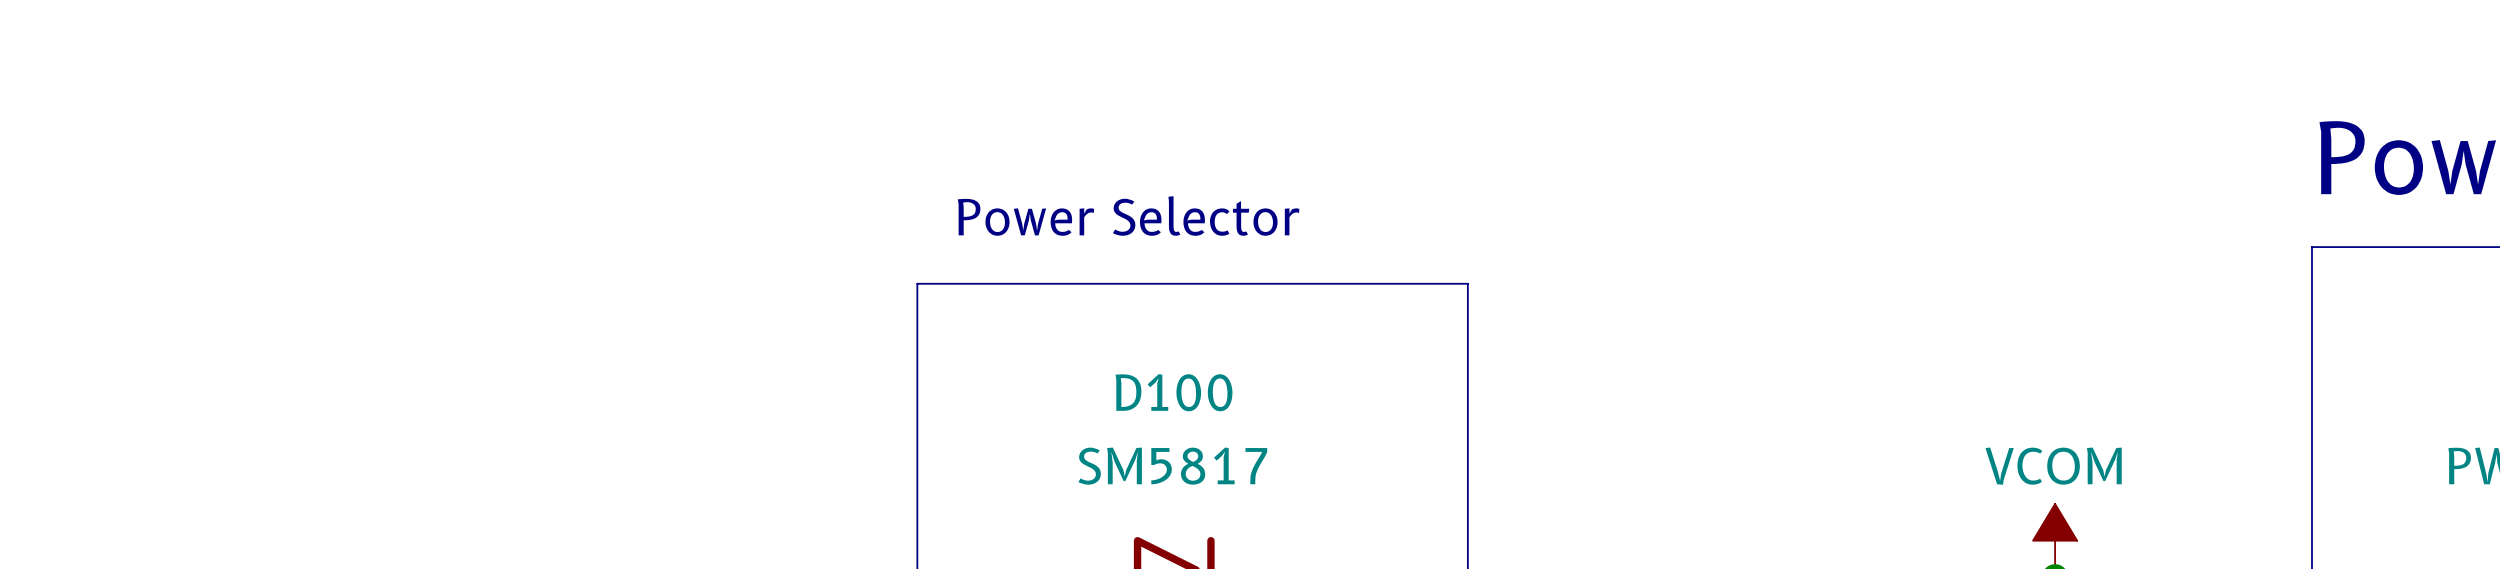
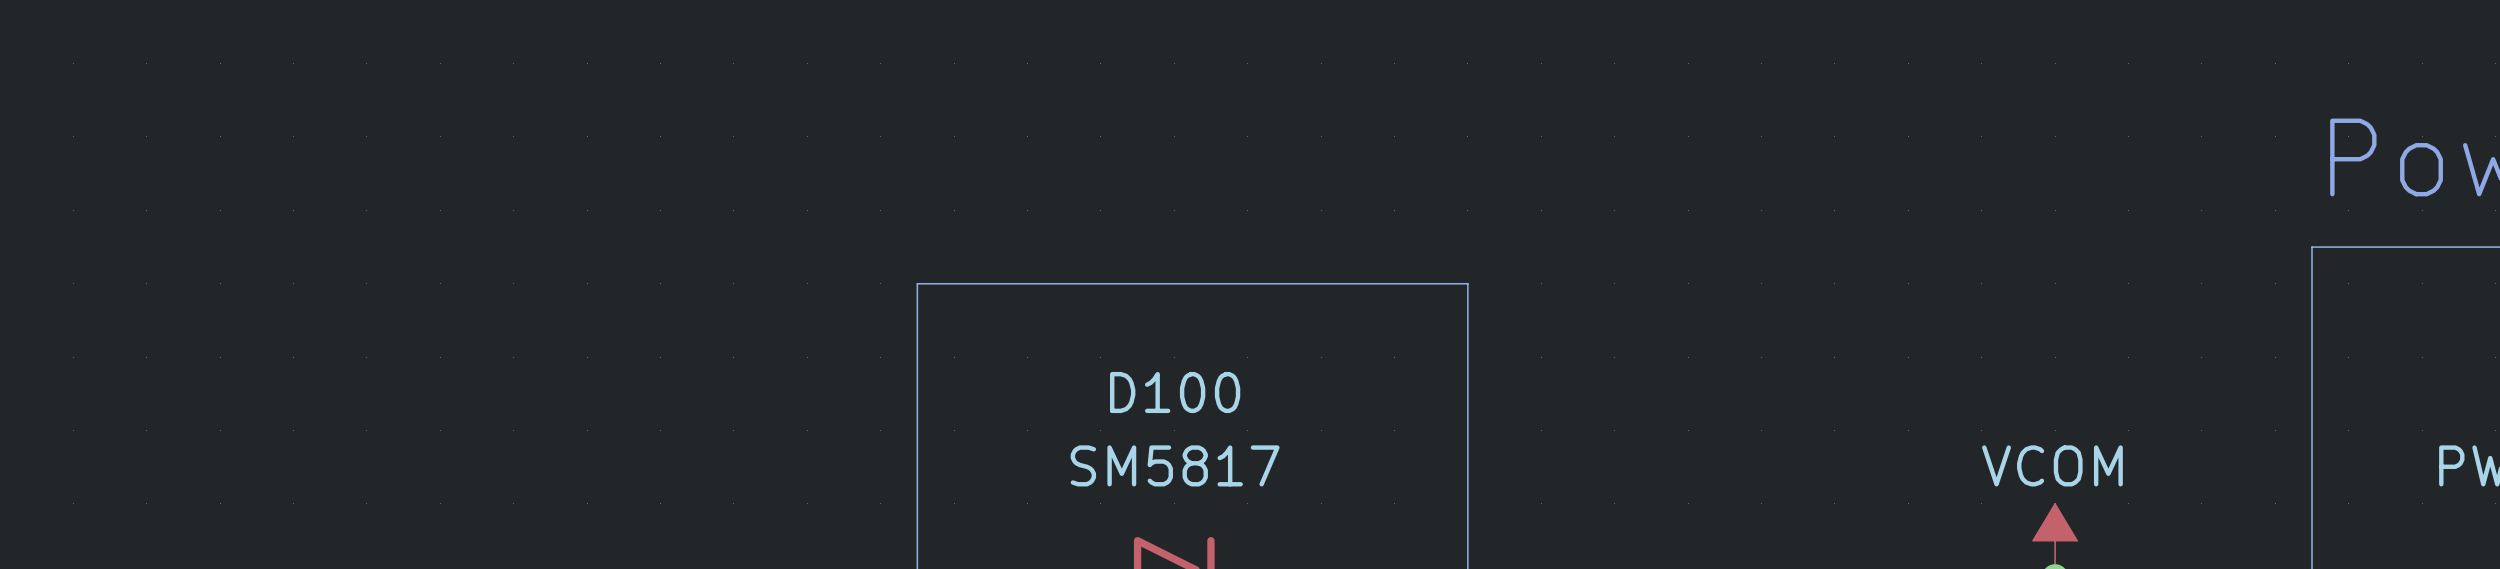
text: Power Selector (1128, 216) -> none

